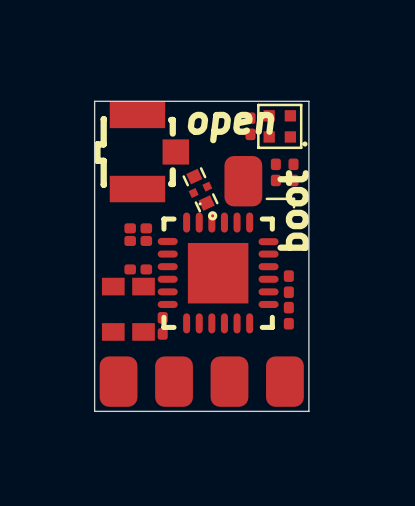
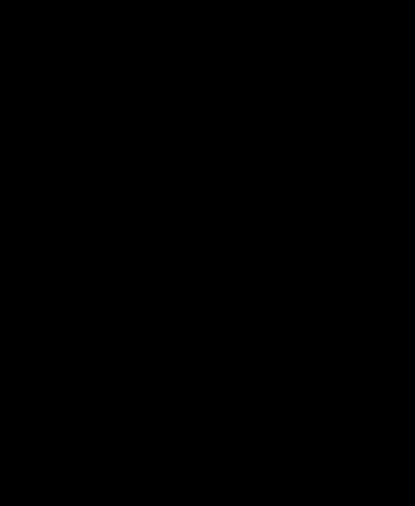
board edge: (94, 101) (308, 101) (308, 411) (94, 411) (94, 101) -> none
part: (250, 126) -> none
part: (282, 126) -> none
text: open (231, 127) -> none
part: (141, 151) -> none
part: (275, 172) -> none
part: (293, 172) -> none
part: (243, 181) -> none
part: (200, 193) -> none
line: (266, 198) (294, 198) (294, 207) -> none
text: boot (293, 210) -> none
part: (138, 228) -> none
part: (138, 240) -> none
part: (138, 269) -> none
part: (218, 272) -> none
part: (288, 284) -> none
part: (128, 309) -> none
part: (288, 315) -> none
part: (162, 325) -> none
part: (118, 381) -> none
part: (174, 381) -> none
part: (229, 381) -> none
part: (284, 381) -> none

